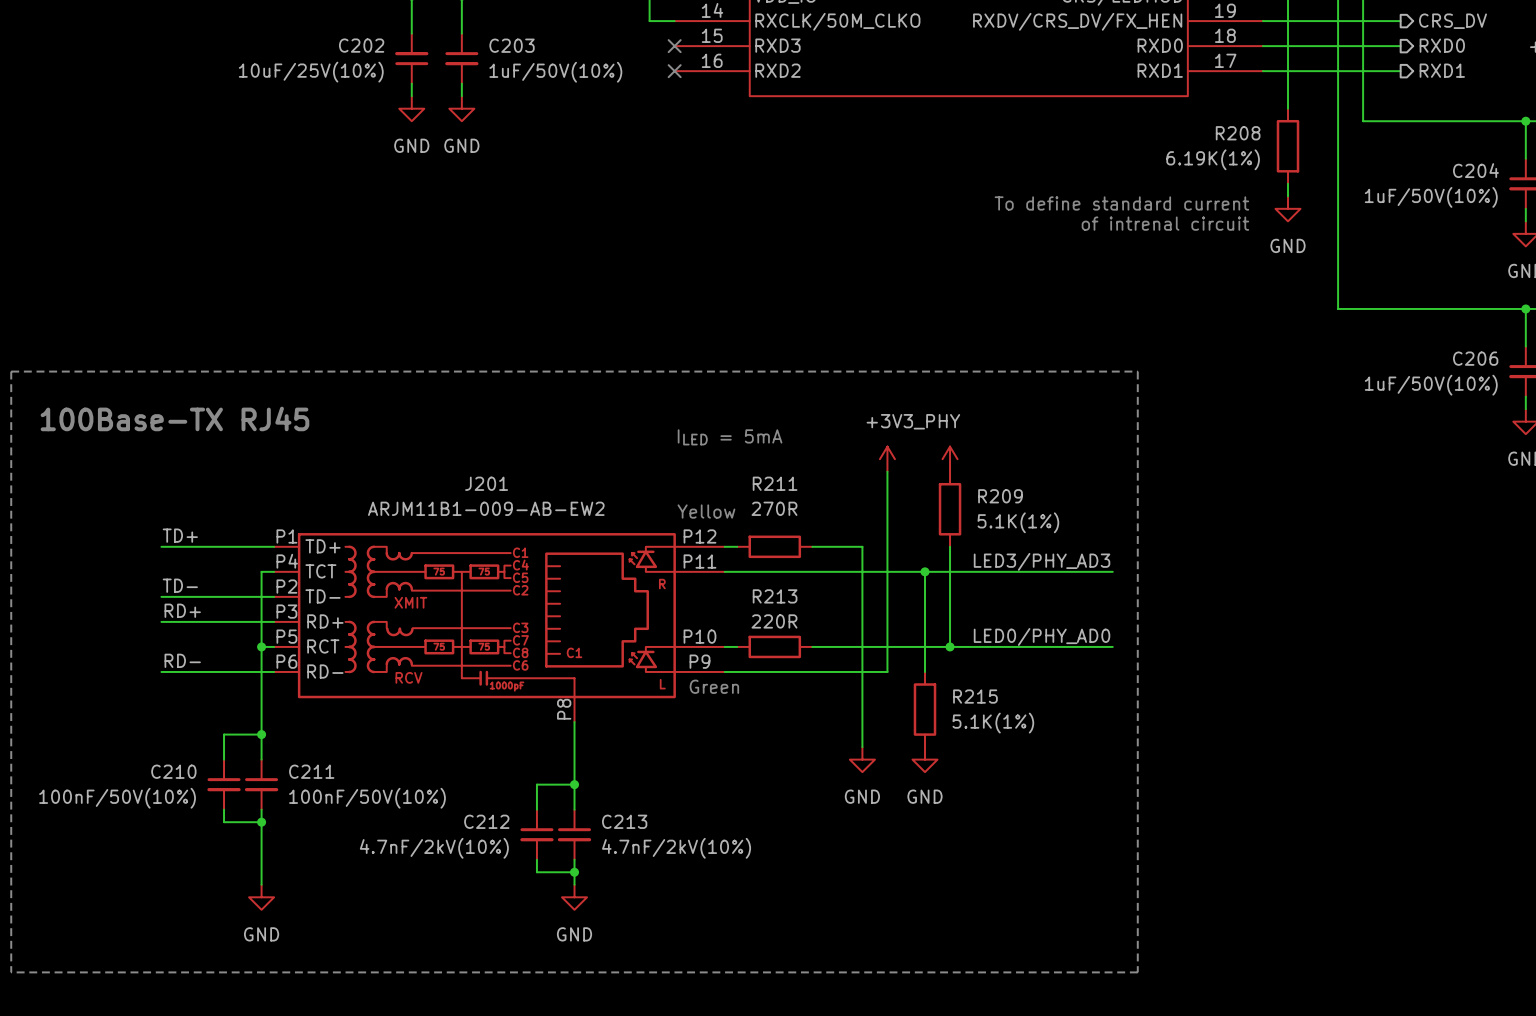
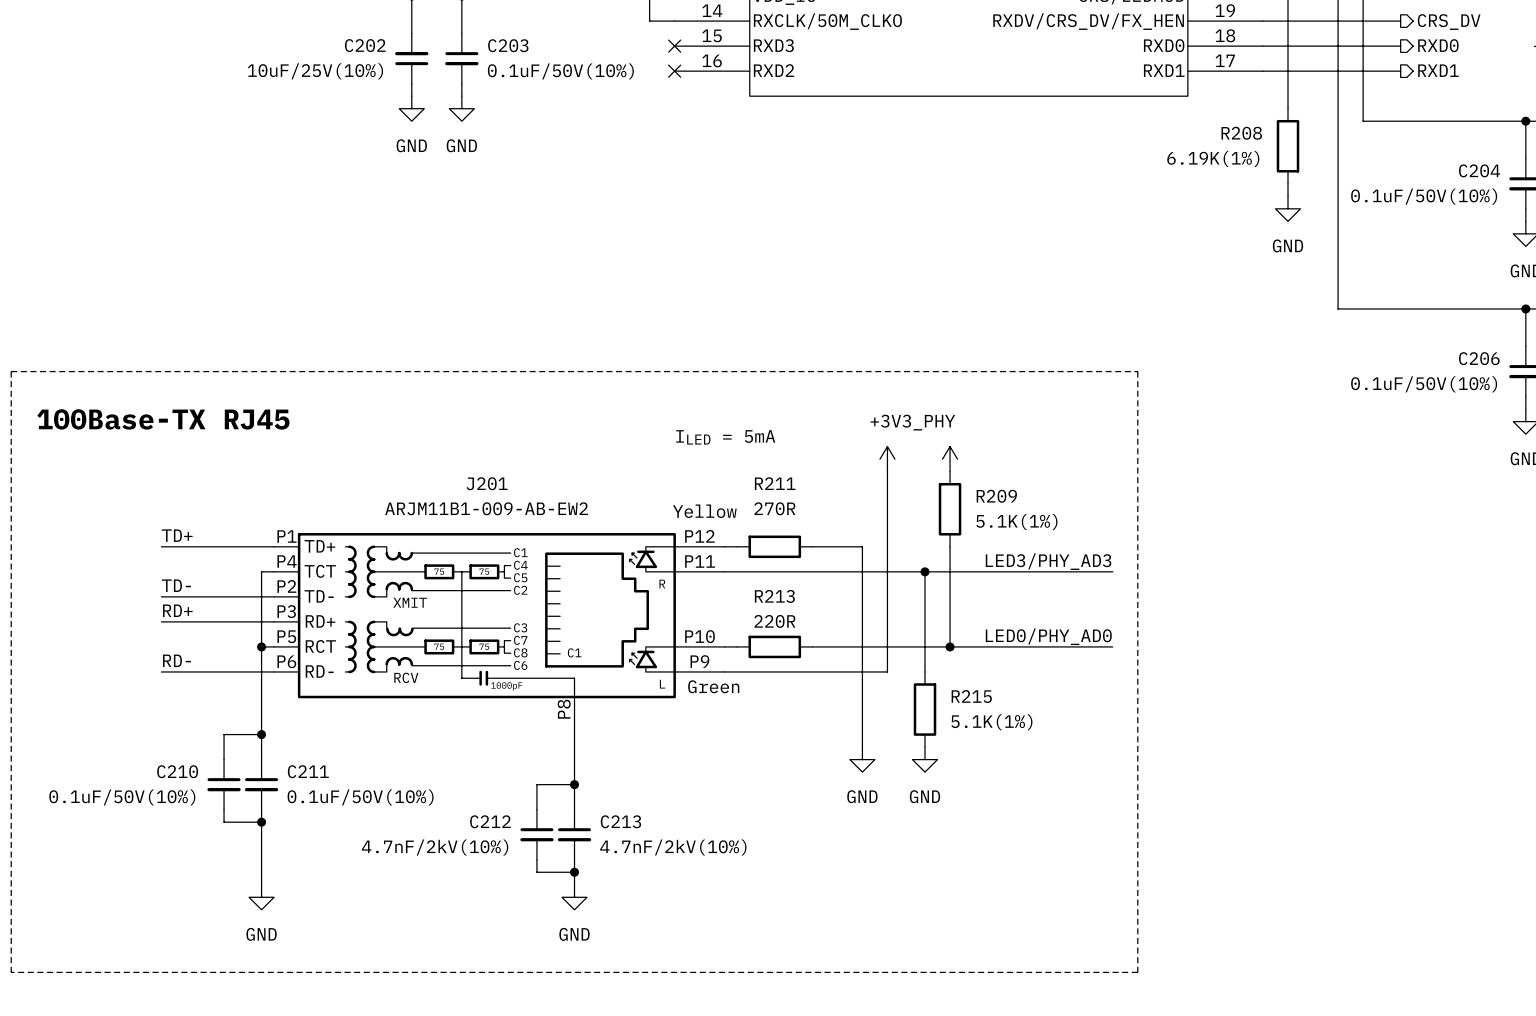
C203 value: 1uF/50V(10%) (555, 72) -> 0.1uF/50V(10%) (560, 71)
C204 value: 1uF/50V(10%) (1431, 197) -> 0.1uF/50V(10%) (1424, 196)
text: To define standard current (1121, 203) -> none
text: of intrenal circuit (1165, 223) -> none
C206 value: 1uF/50V(10%) (1431, 385) -> 0.1uF/50V(10%) (1424, 384)
C210 value: 100nF/50V(10%) (117, 798) -> 0.1uF/50V(10%) (122, 797)
C211 value: 100nF/50V(10%) (367, 798) -> 0.1uF/50V(10%) (360, 797)

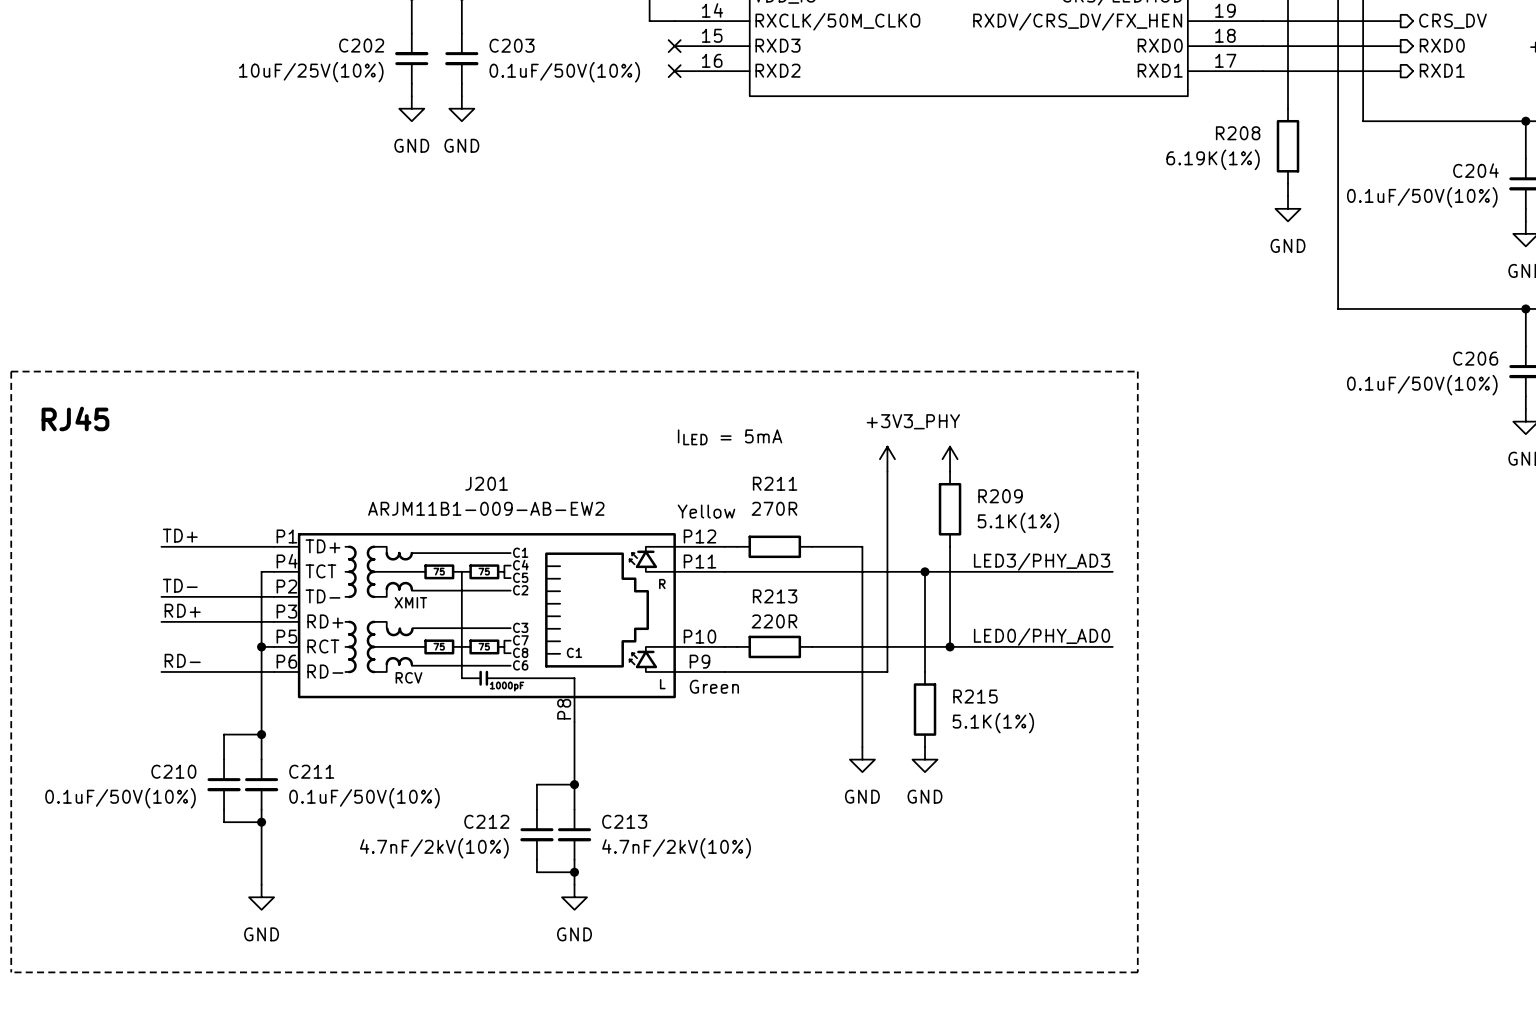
text: 100Base-TX RJ45 (163, 419) -> RJ45 (75, 418)

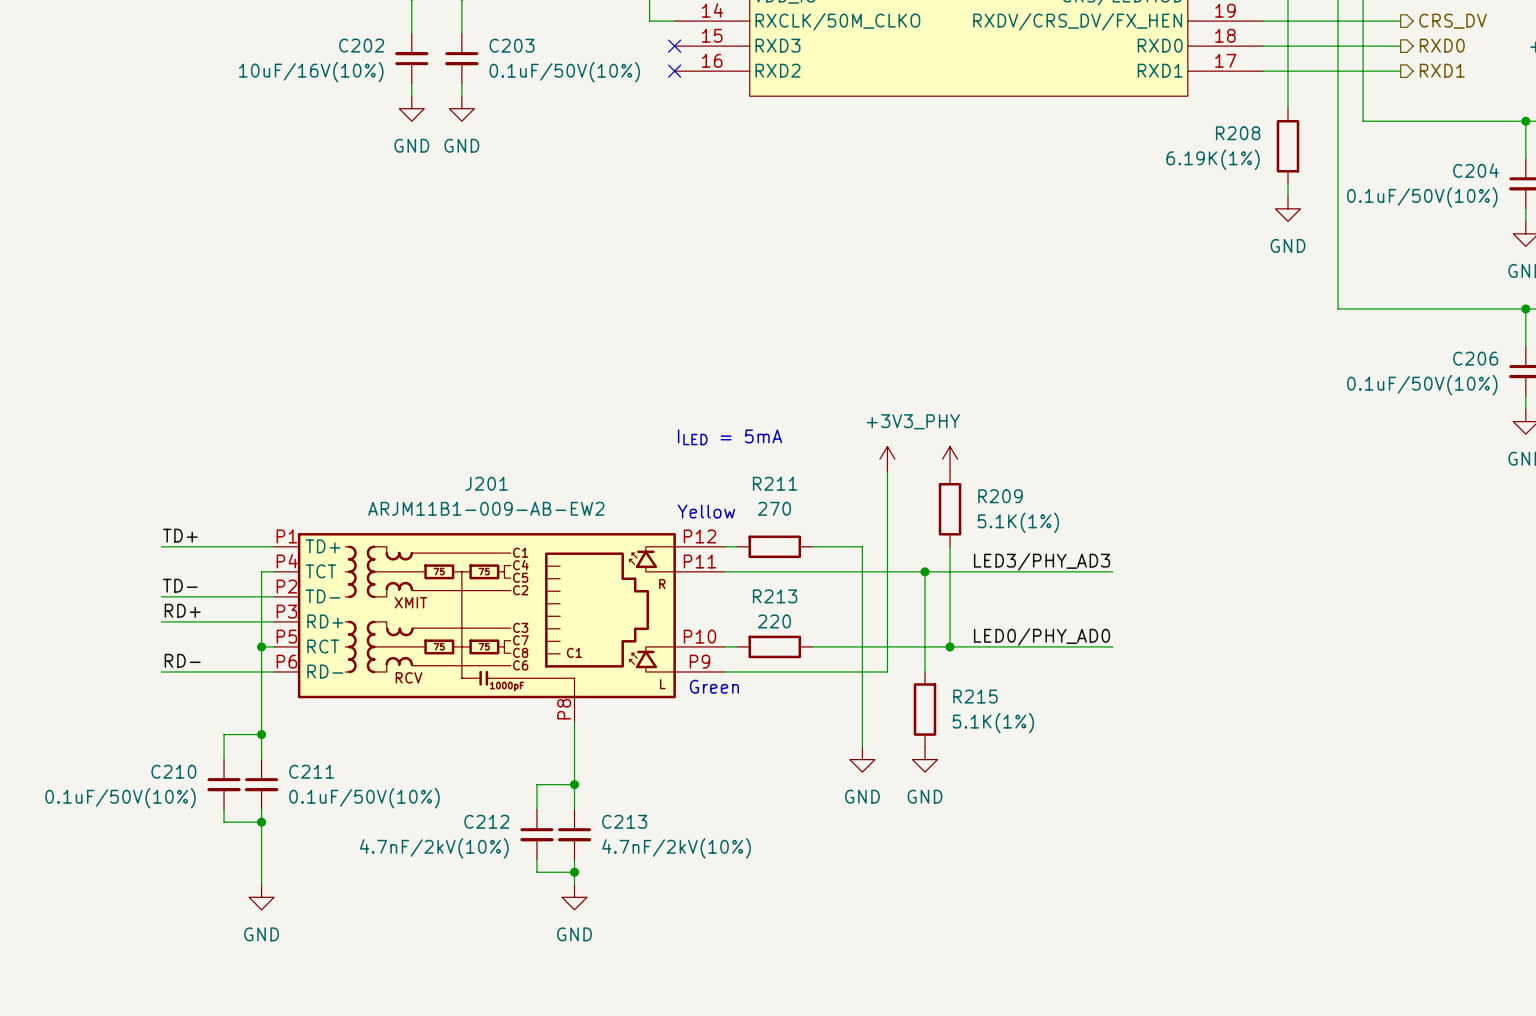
C202 value: 10uF/25V(10%) (311, 72) -> 10uF/16V(10%) (311, 72)
line: (11, 371) (1137, 371) (1137, 972) (11, 972) (11, 371) -> none
text: RJ45 (75, 418) -> none
R211 value: 270R (774, 508) -> 270 (774, 508)
R213 value: 220R (774, 621) -> 220 (774, 621)

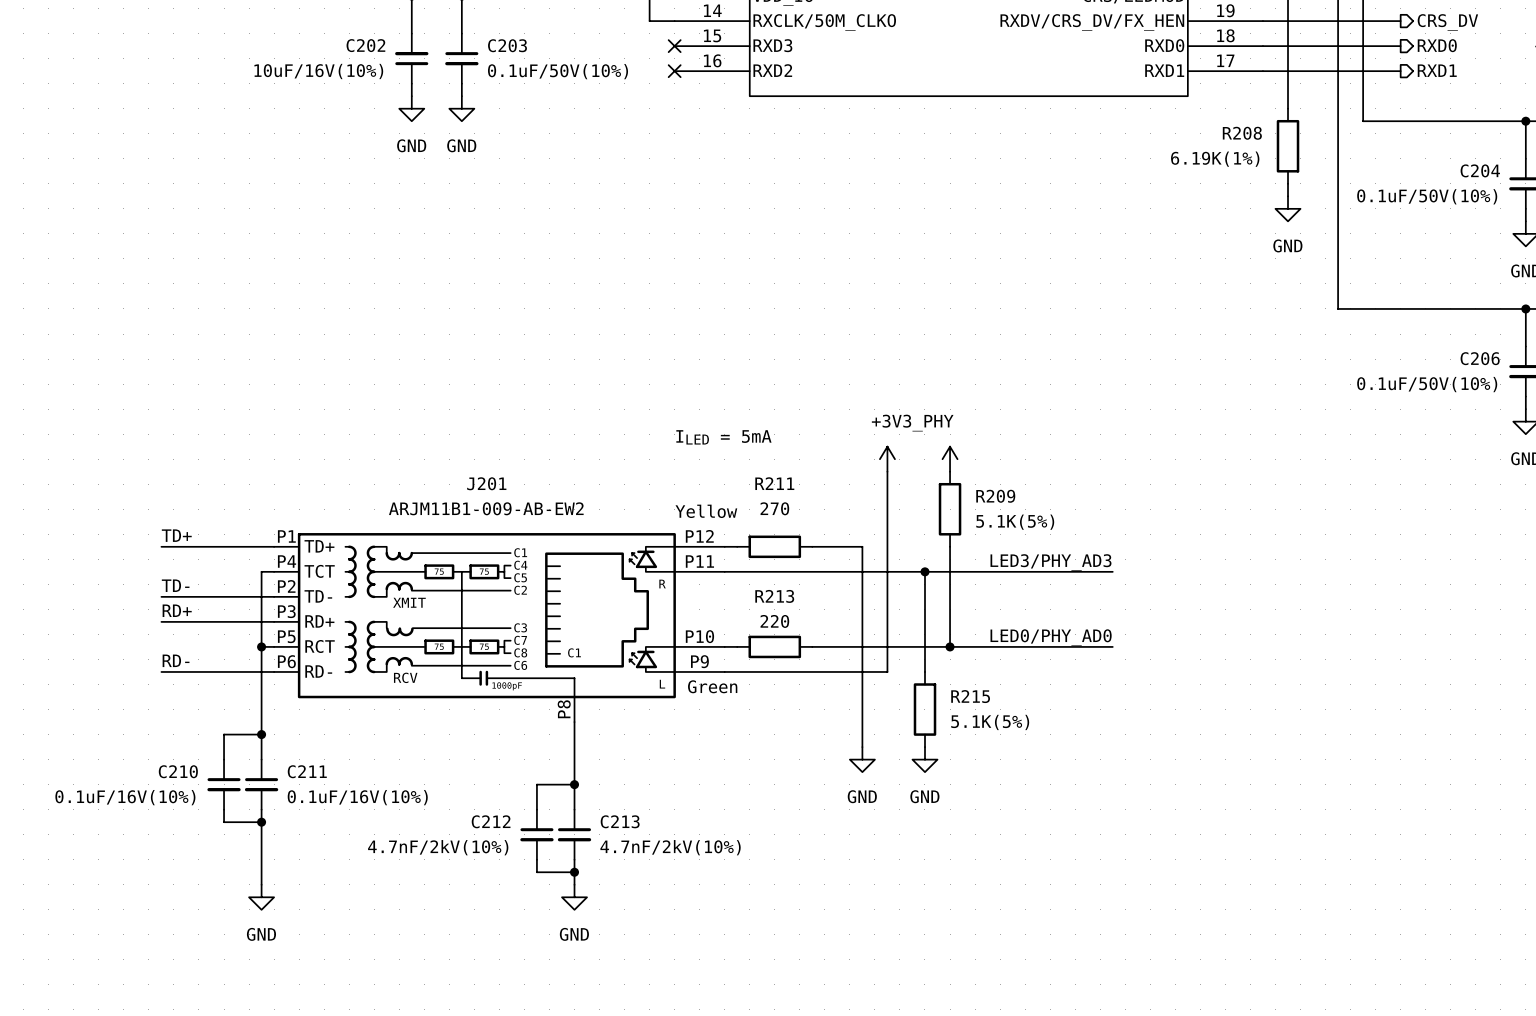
R209 value: 5.1K(1%) (1018, 522) -> 5.1K(5%) (1015, 522)
R215 value: 5.1K(1%) (993, 723) -> 5.1K(5%) (990, 722)
C210 value: 0.1uF/50V(10%) (120, 798) -> 0.1uF/16V(10%) (125, 797)
C211 value: 0.1uF/50V(10%) (364, 798) -> 0.1uF/16V(10%) (357, 797)

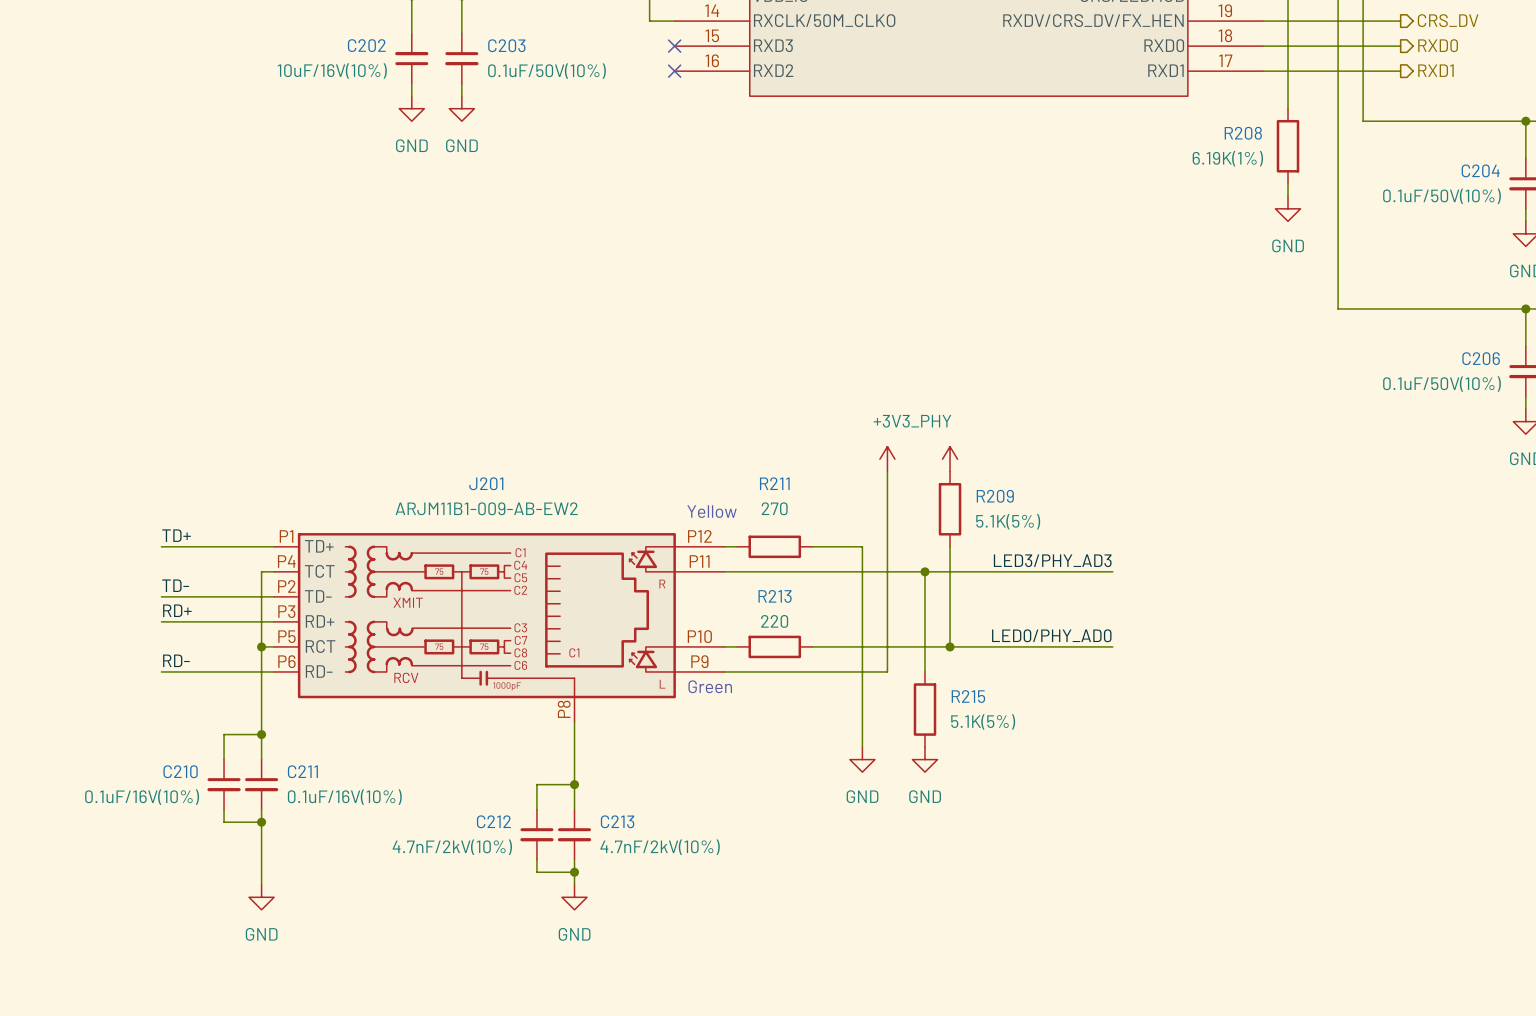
text: ILED = 5mA (723, 437) -> none

